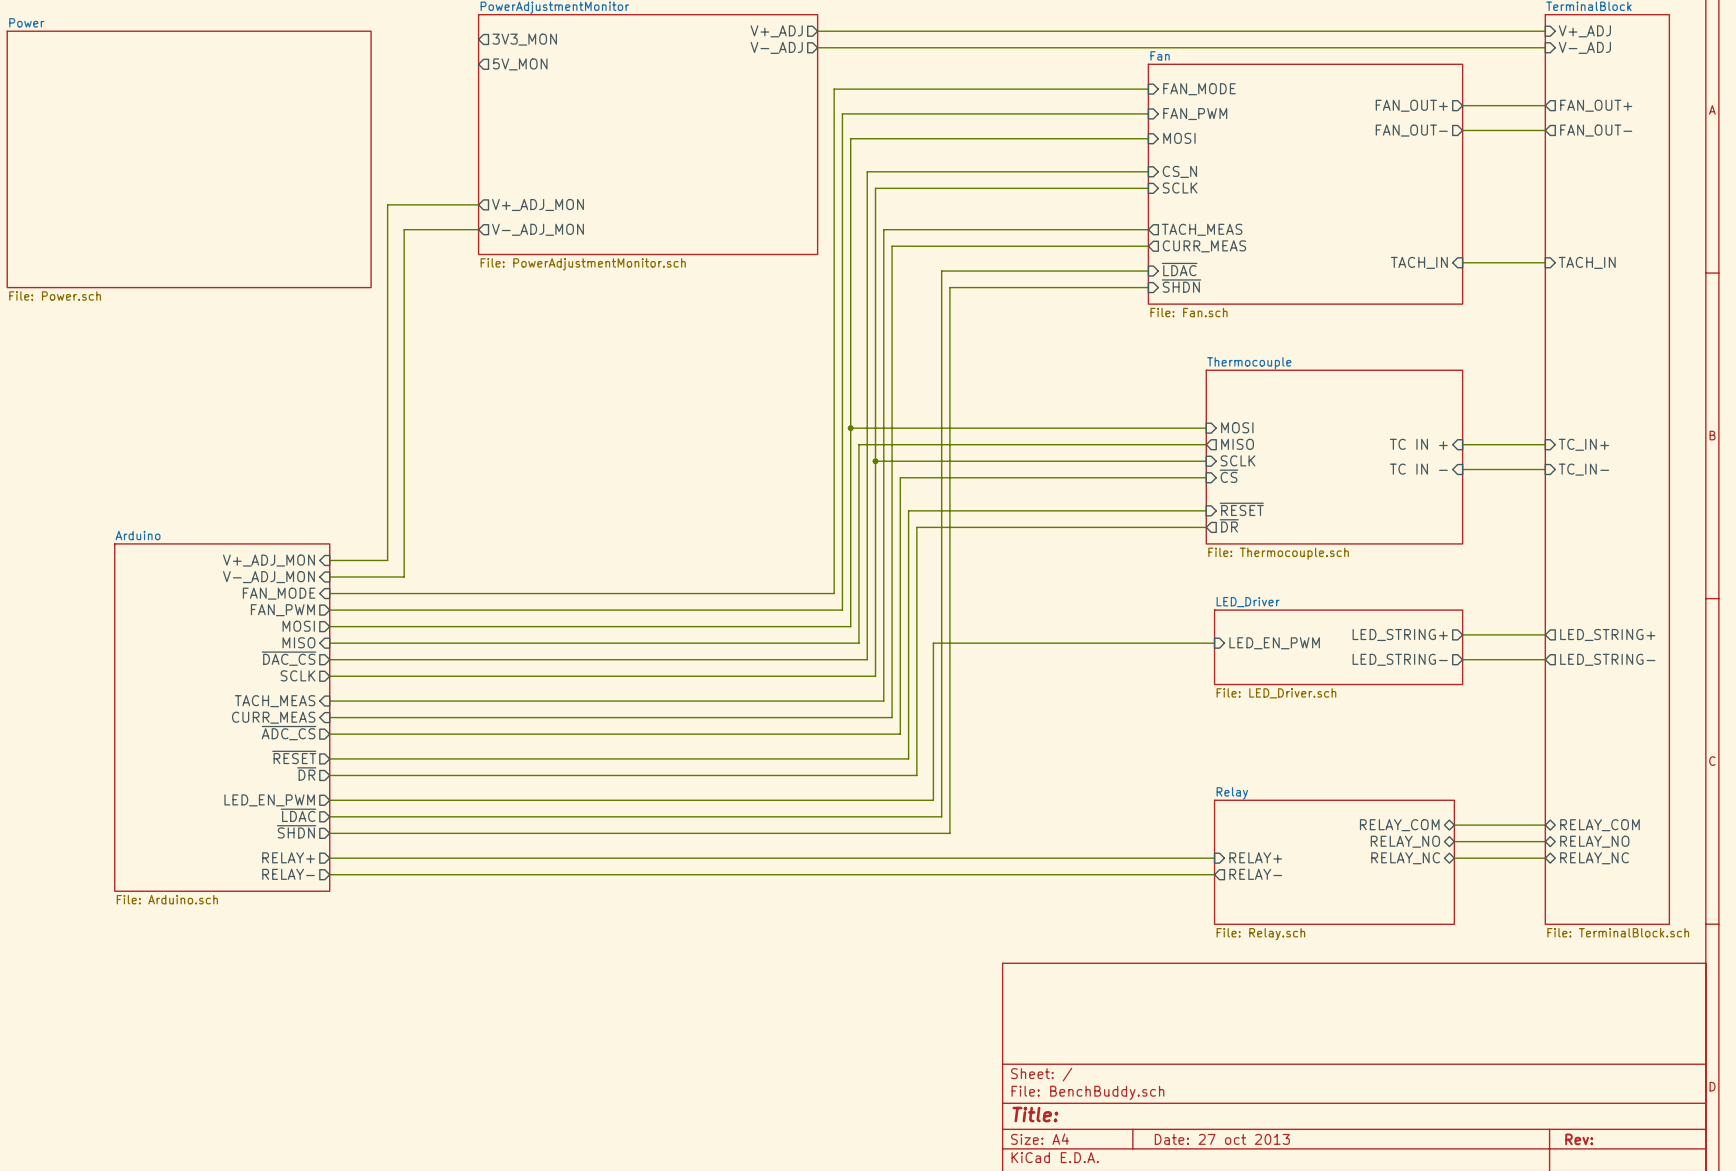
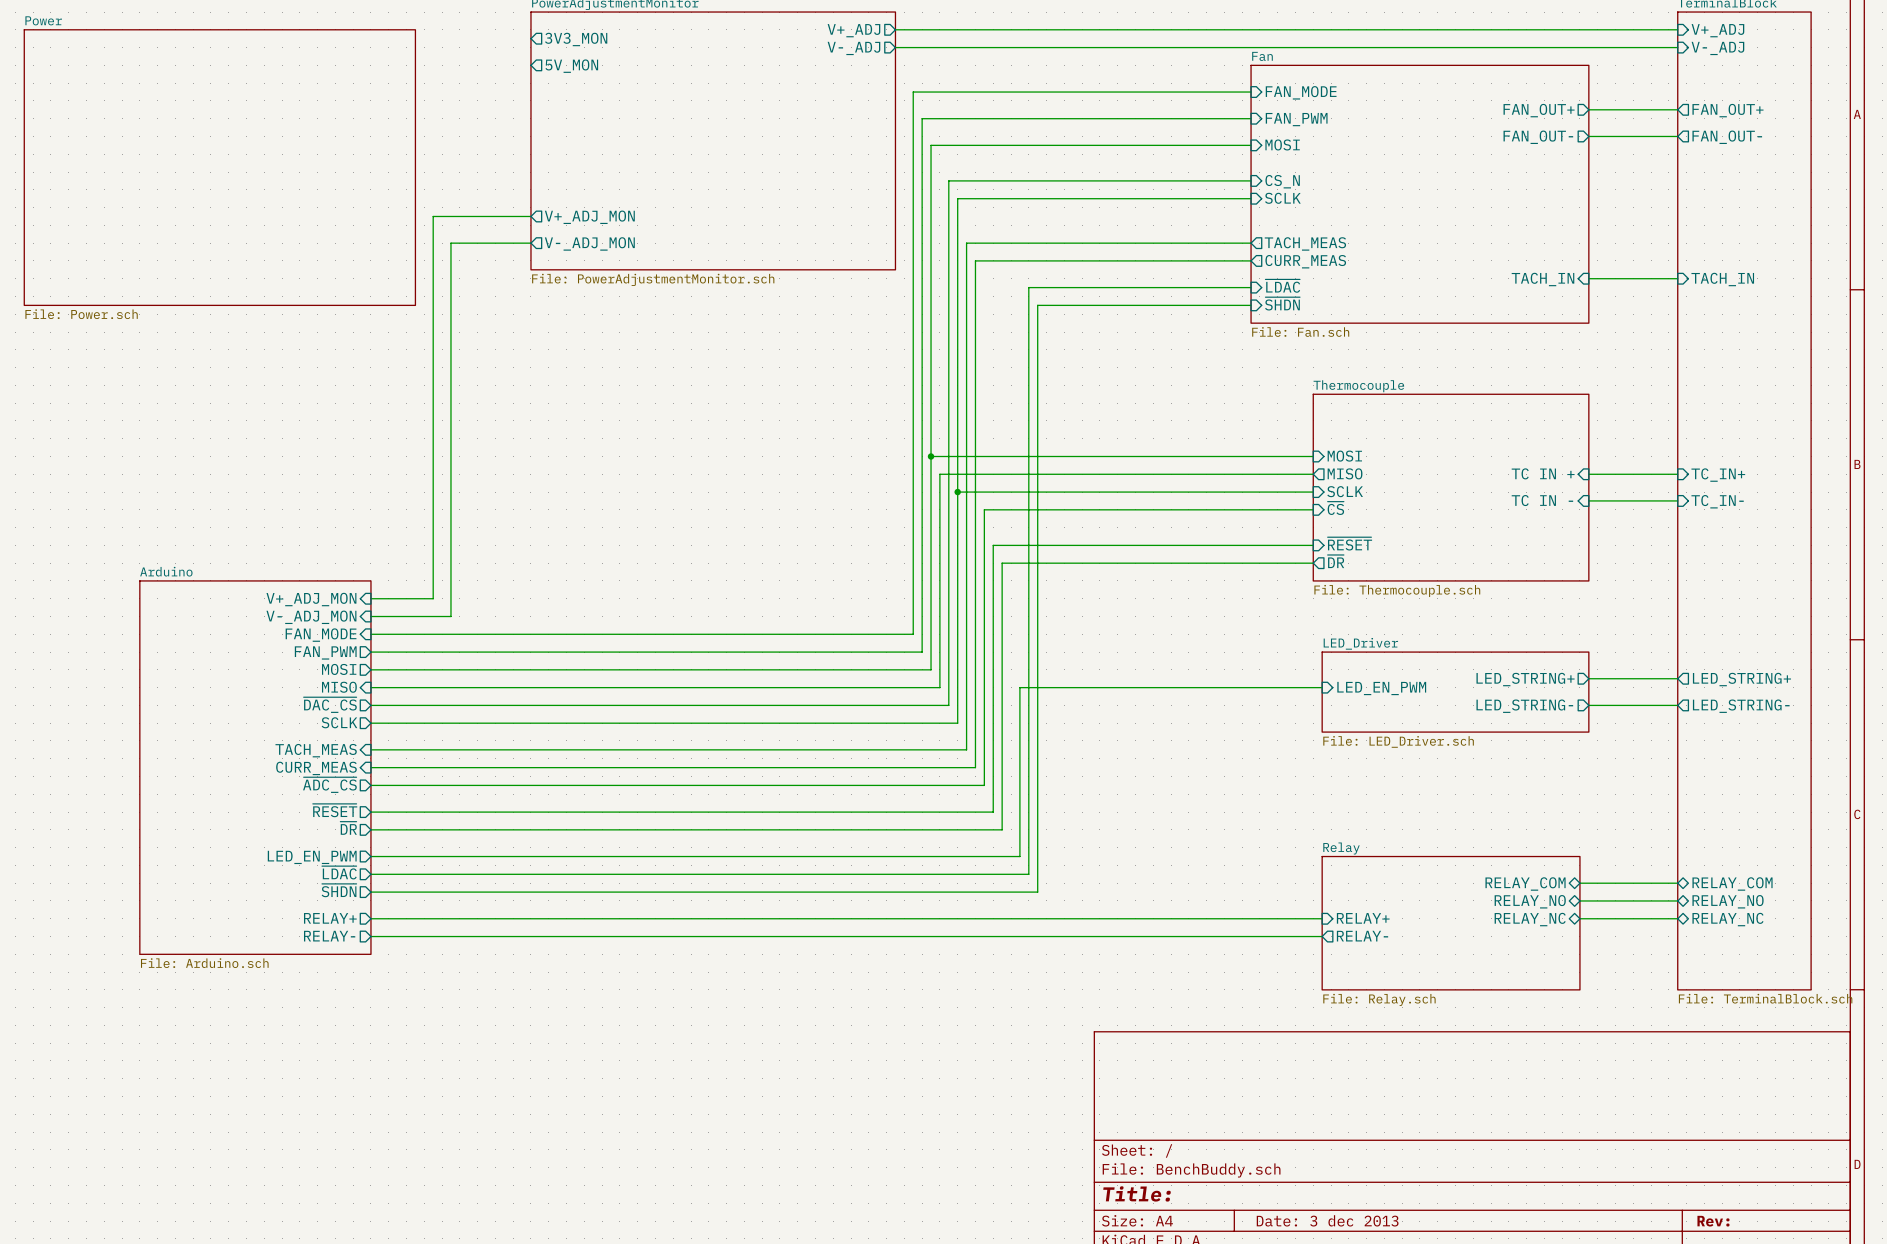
title block: Date: 27 oct 2013 (1222, 1139) -> Date: 3 dec 2013 (1327, 1220)

